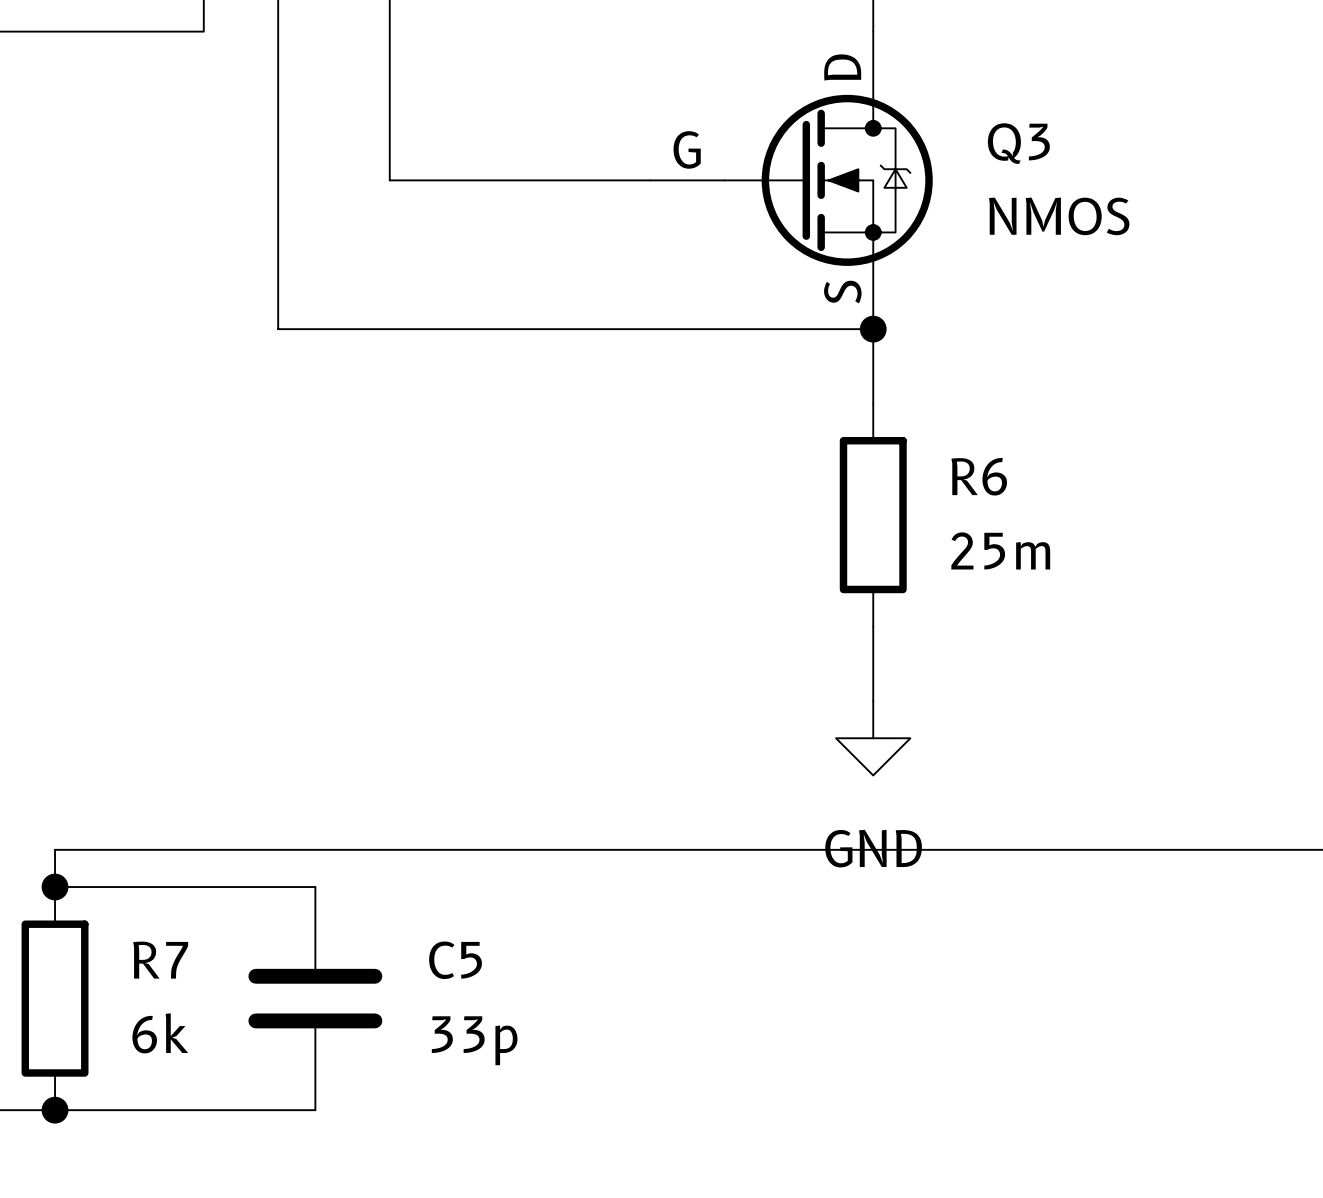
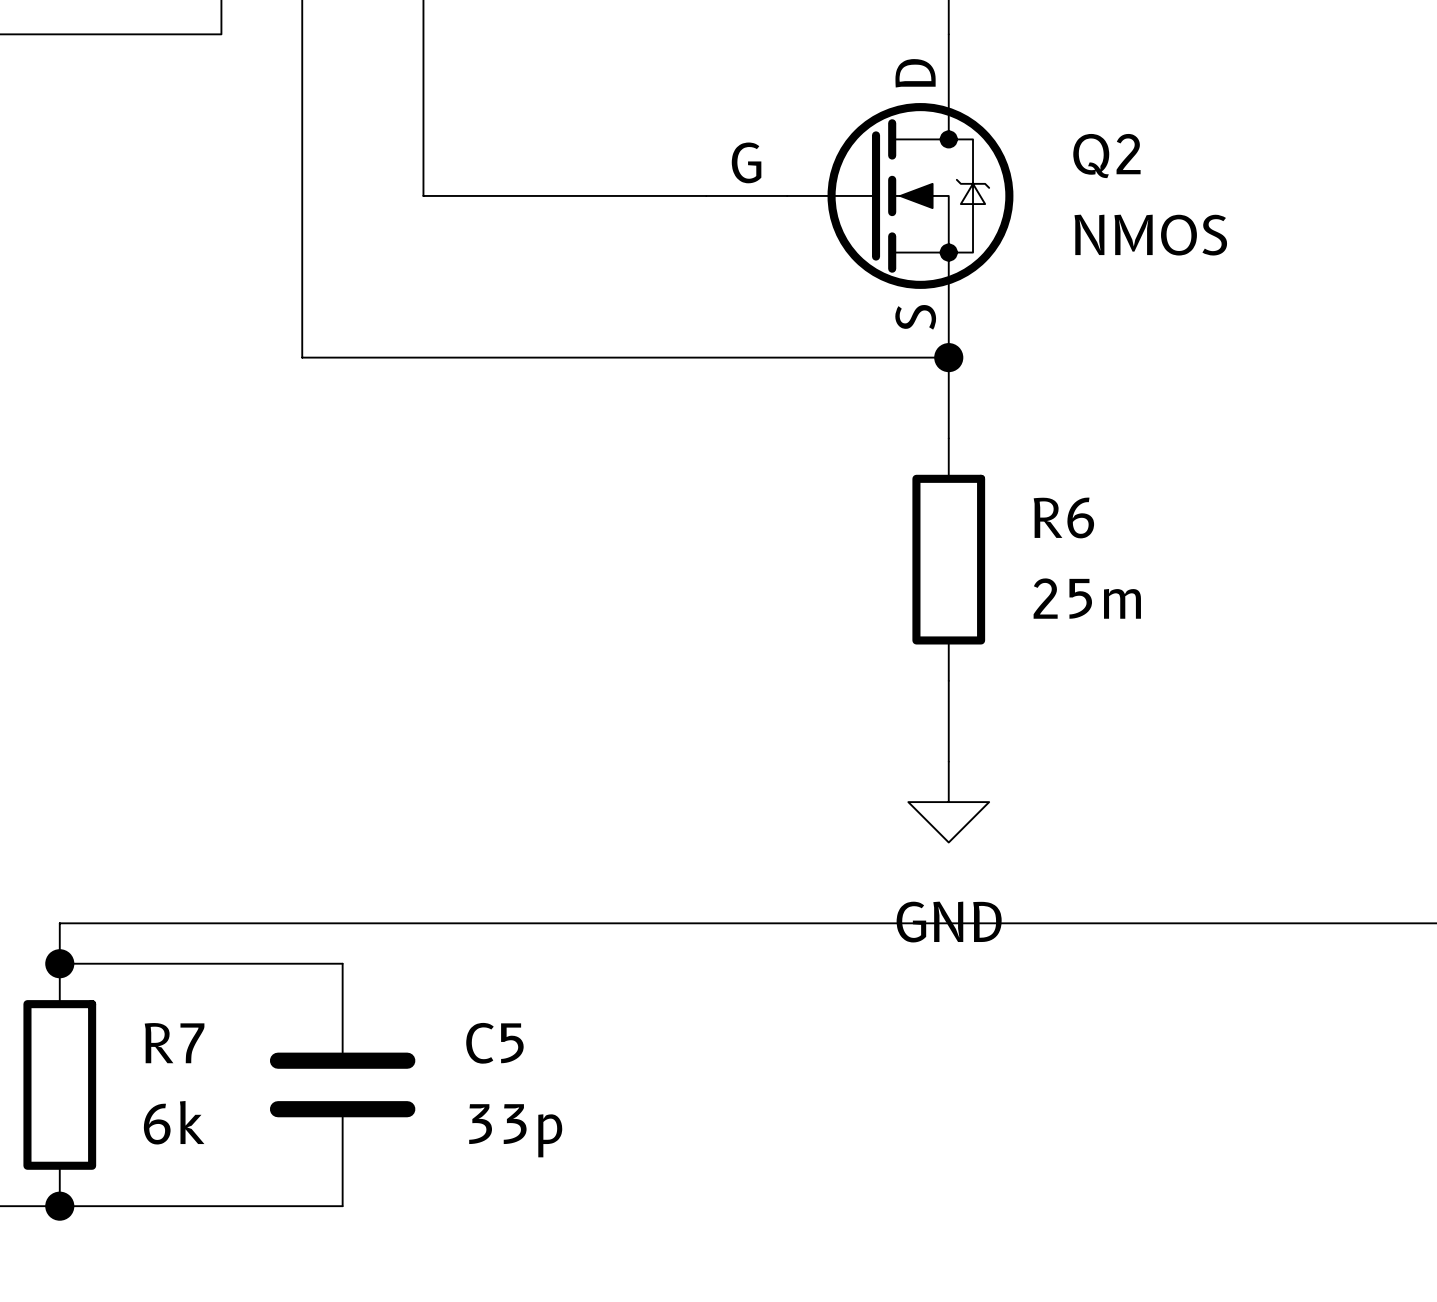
Q3 name: Q3 (1018, 143) -> Q2 (1106, 156)

